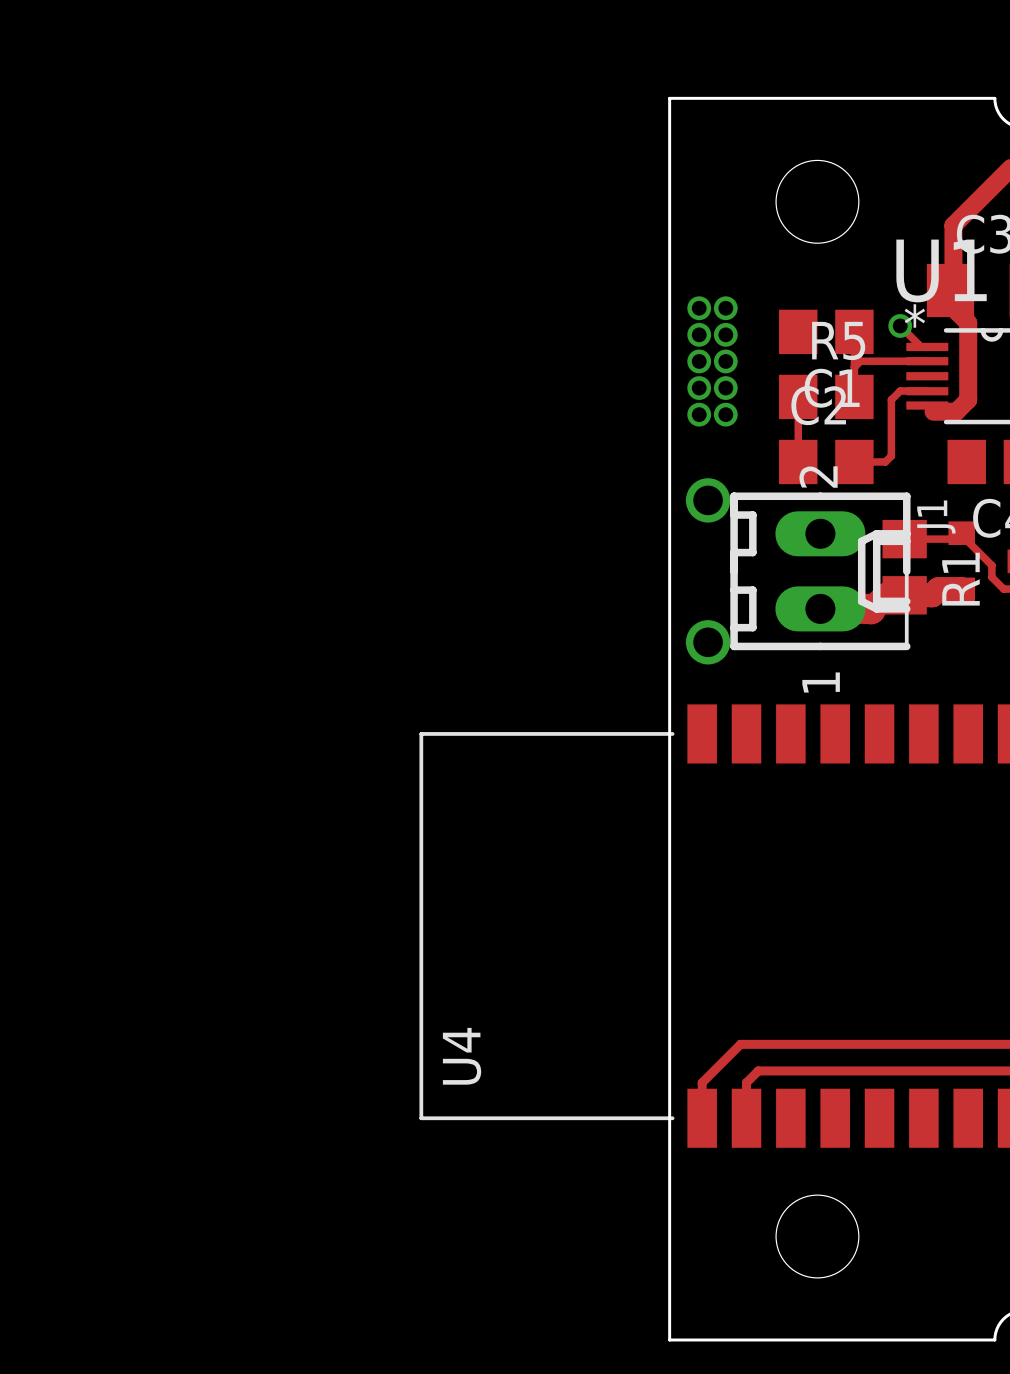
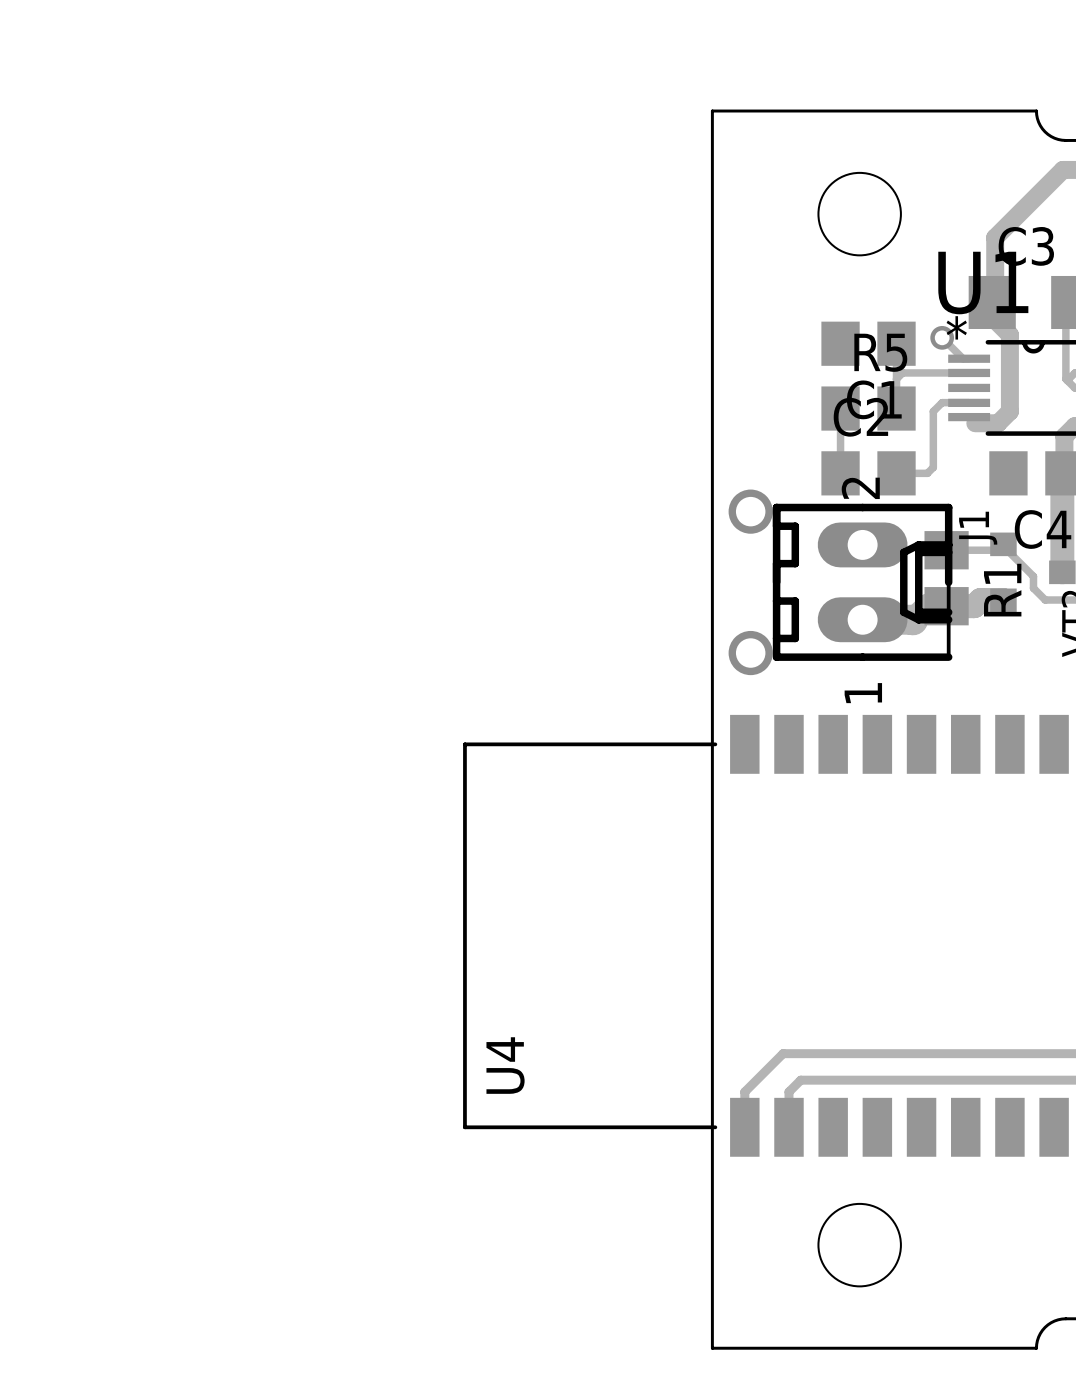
via: (699, 308) -> none
via: (725, 308) -> none
via: (699, 334) -> none
via: (725, 334) -> none
via: (699, 361) -> none
via: (725, 361) -> none
via: (699, 388) -> none
via: (725, 388) -> none
via: (699, 414) -> none
via: (725, 414) -> none

